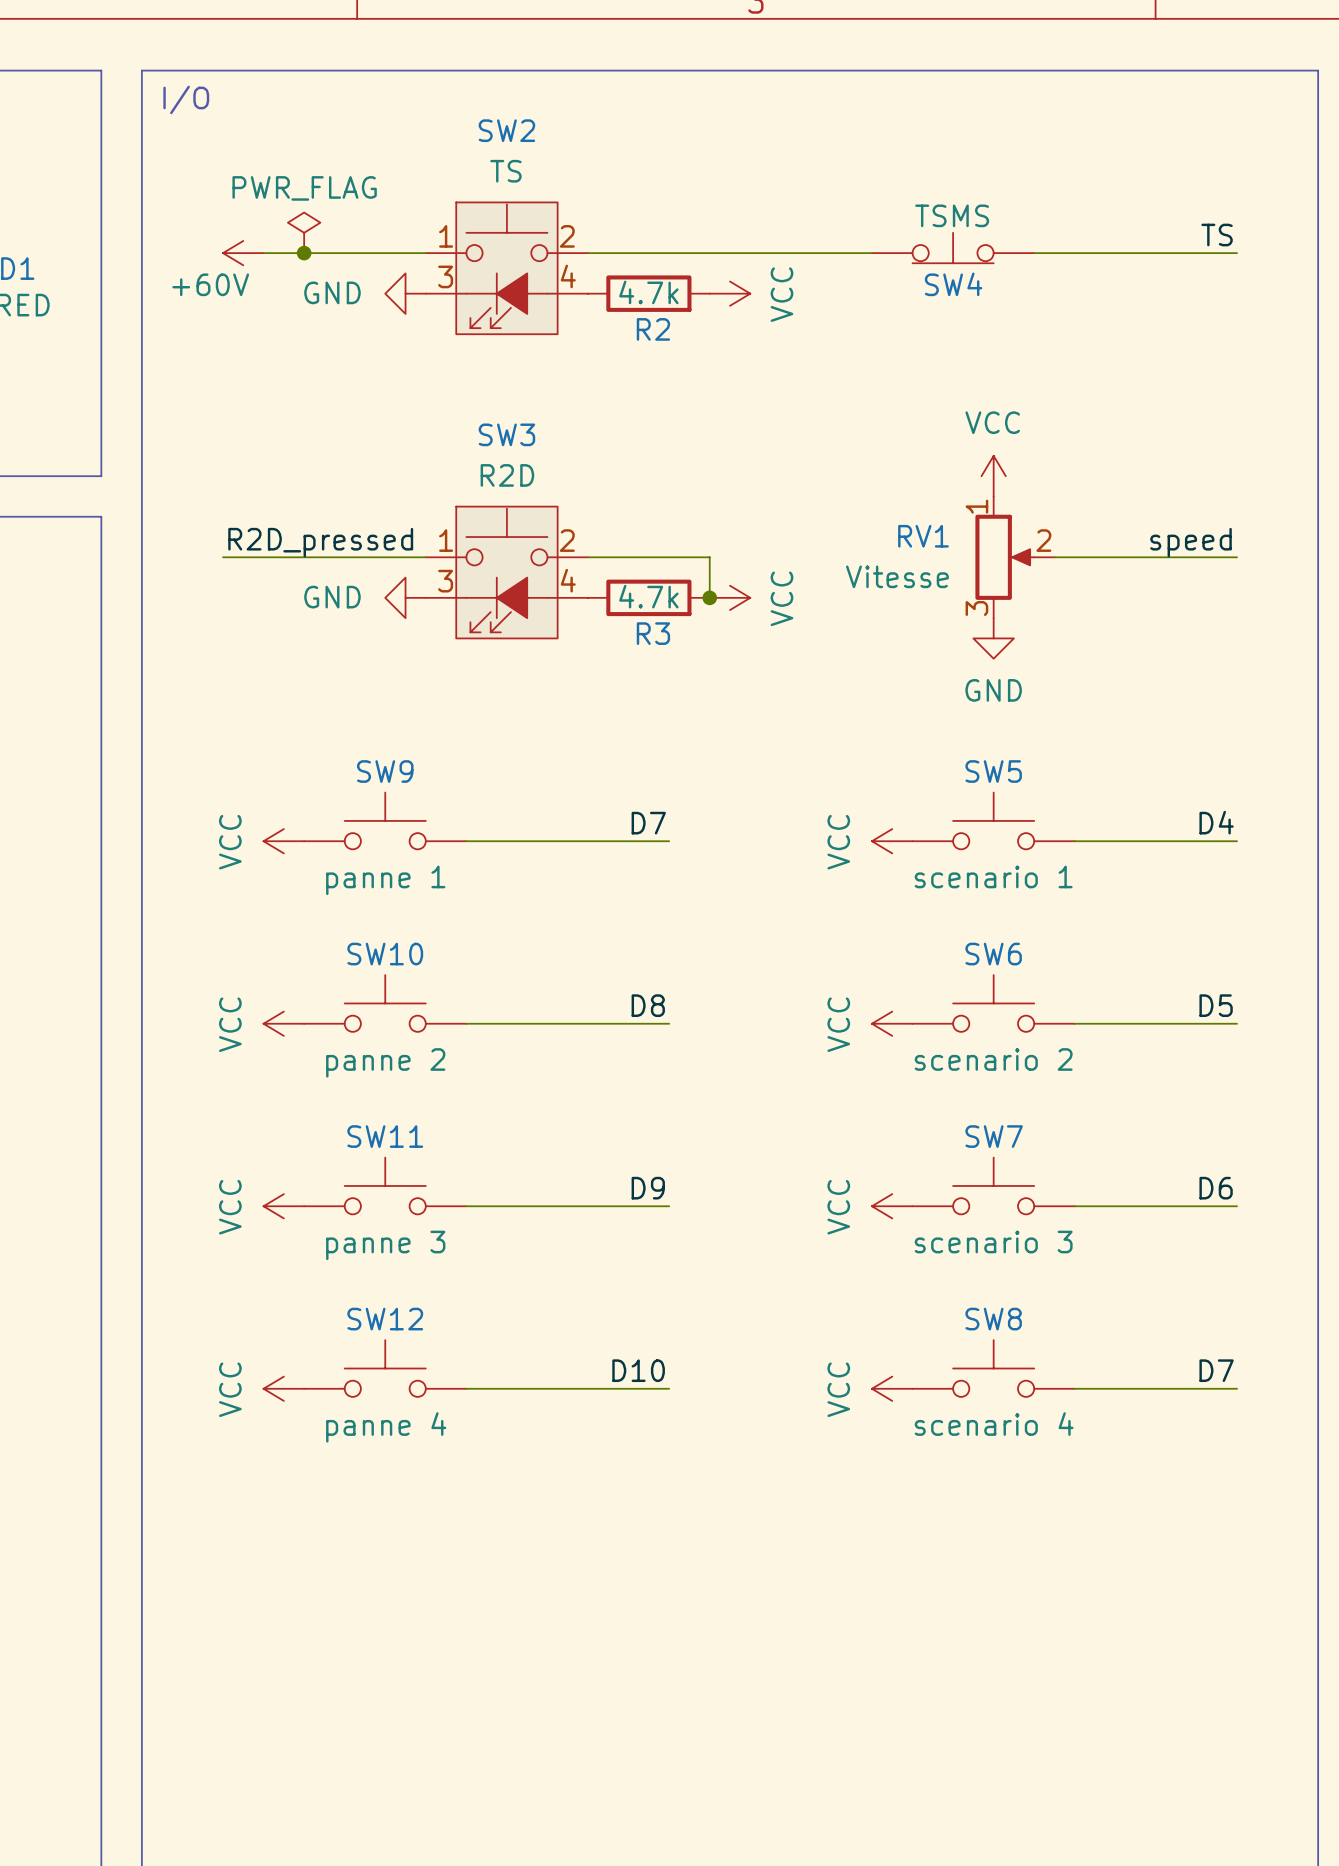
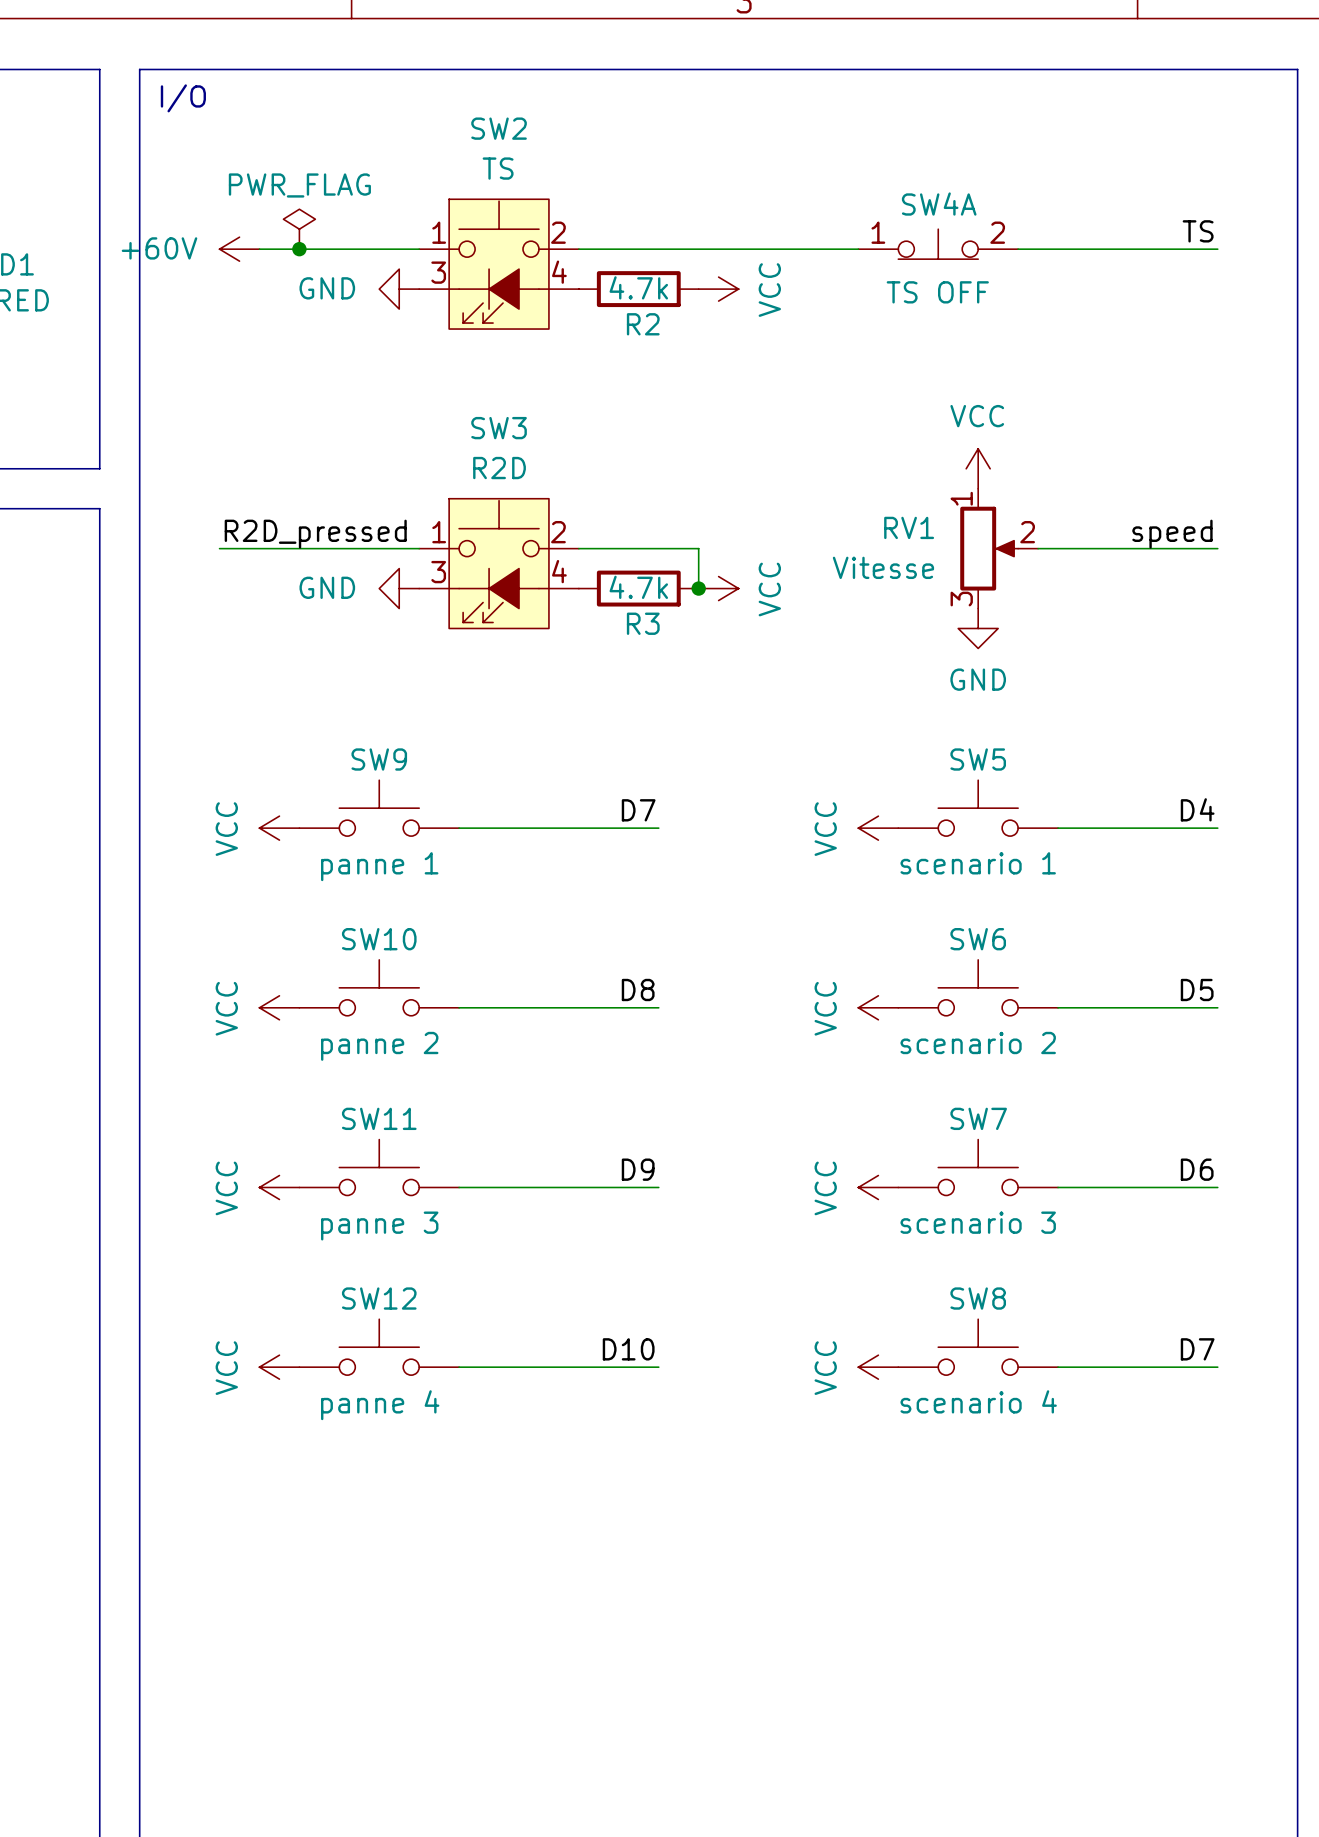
SW4 value: TSMS (952, 215) -> TS OFF (937, 292)
SW4 pin number: none -> 1 (878, 232)
SW4 pin number: none -> 2 (997, 232)
power symbol text position: +60V (210, 284) -> +60V (159, 248)
SW4 name: SW4 (953, 284) -> SW4A (939, 204)

